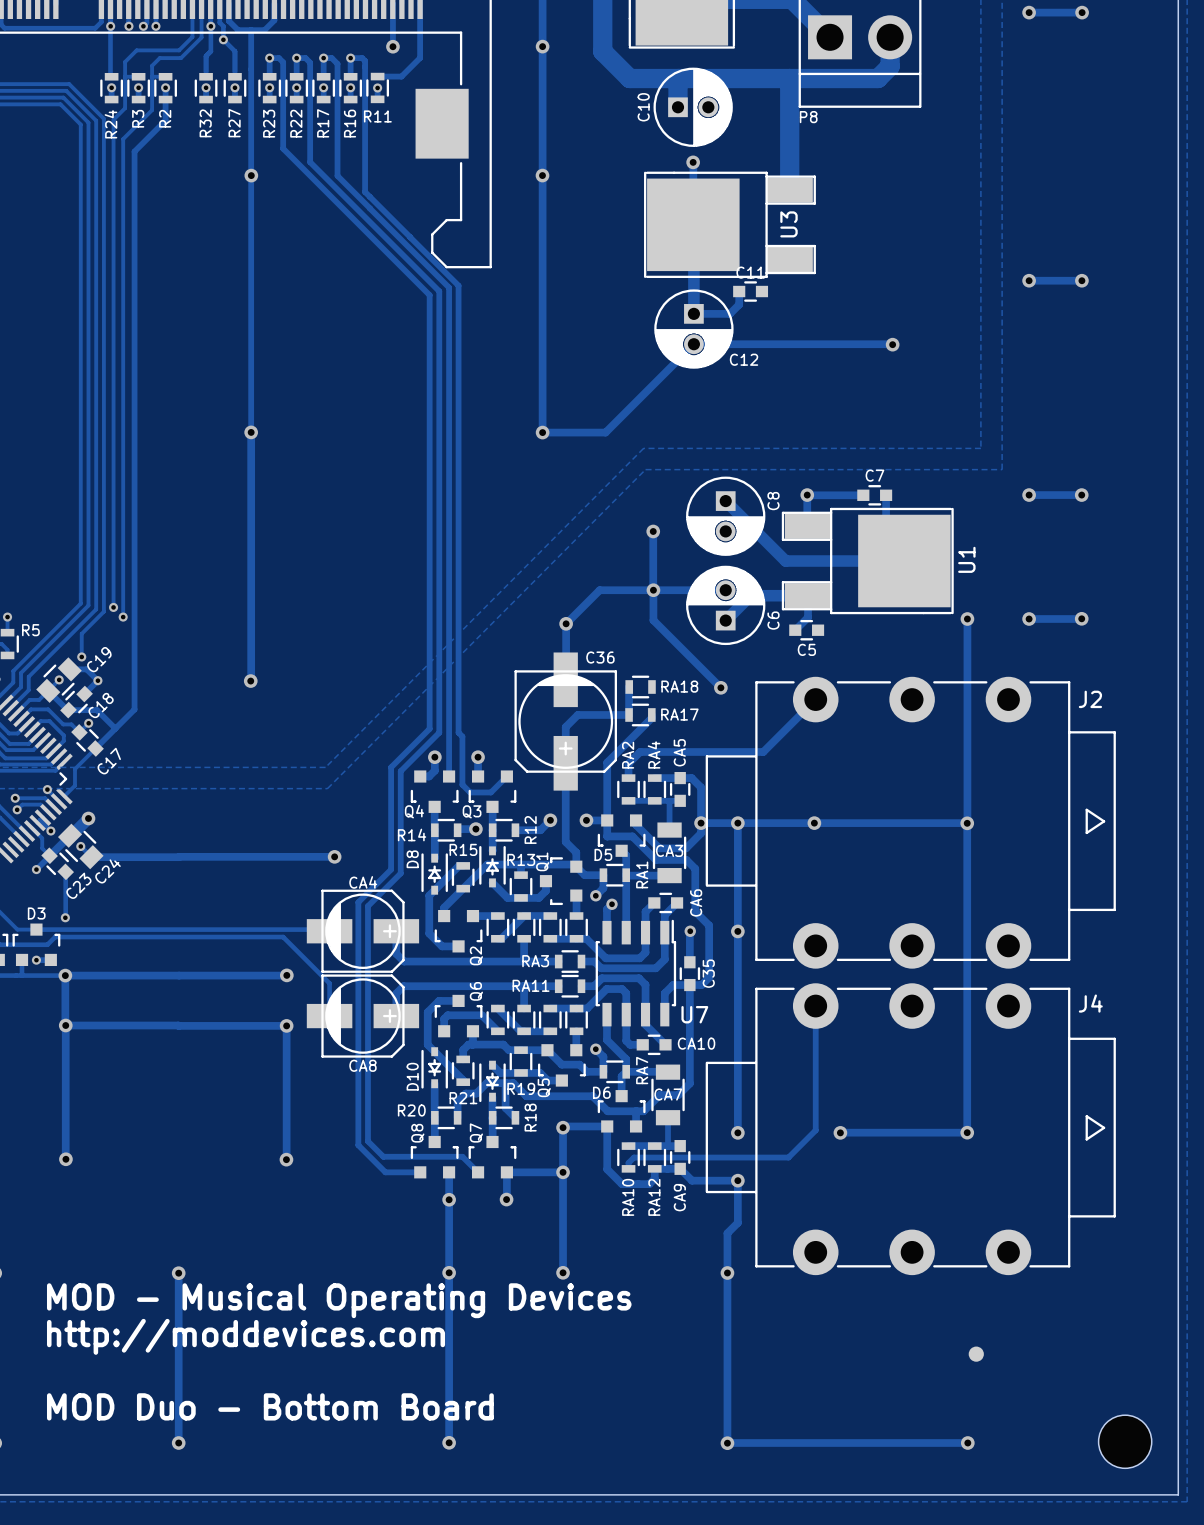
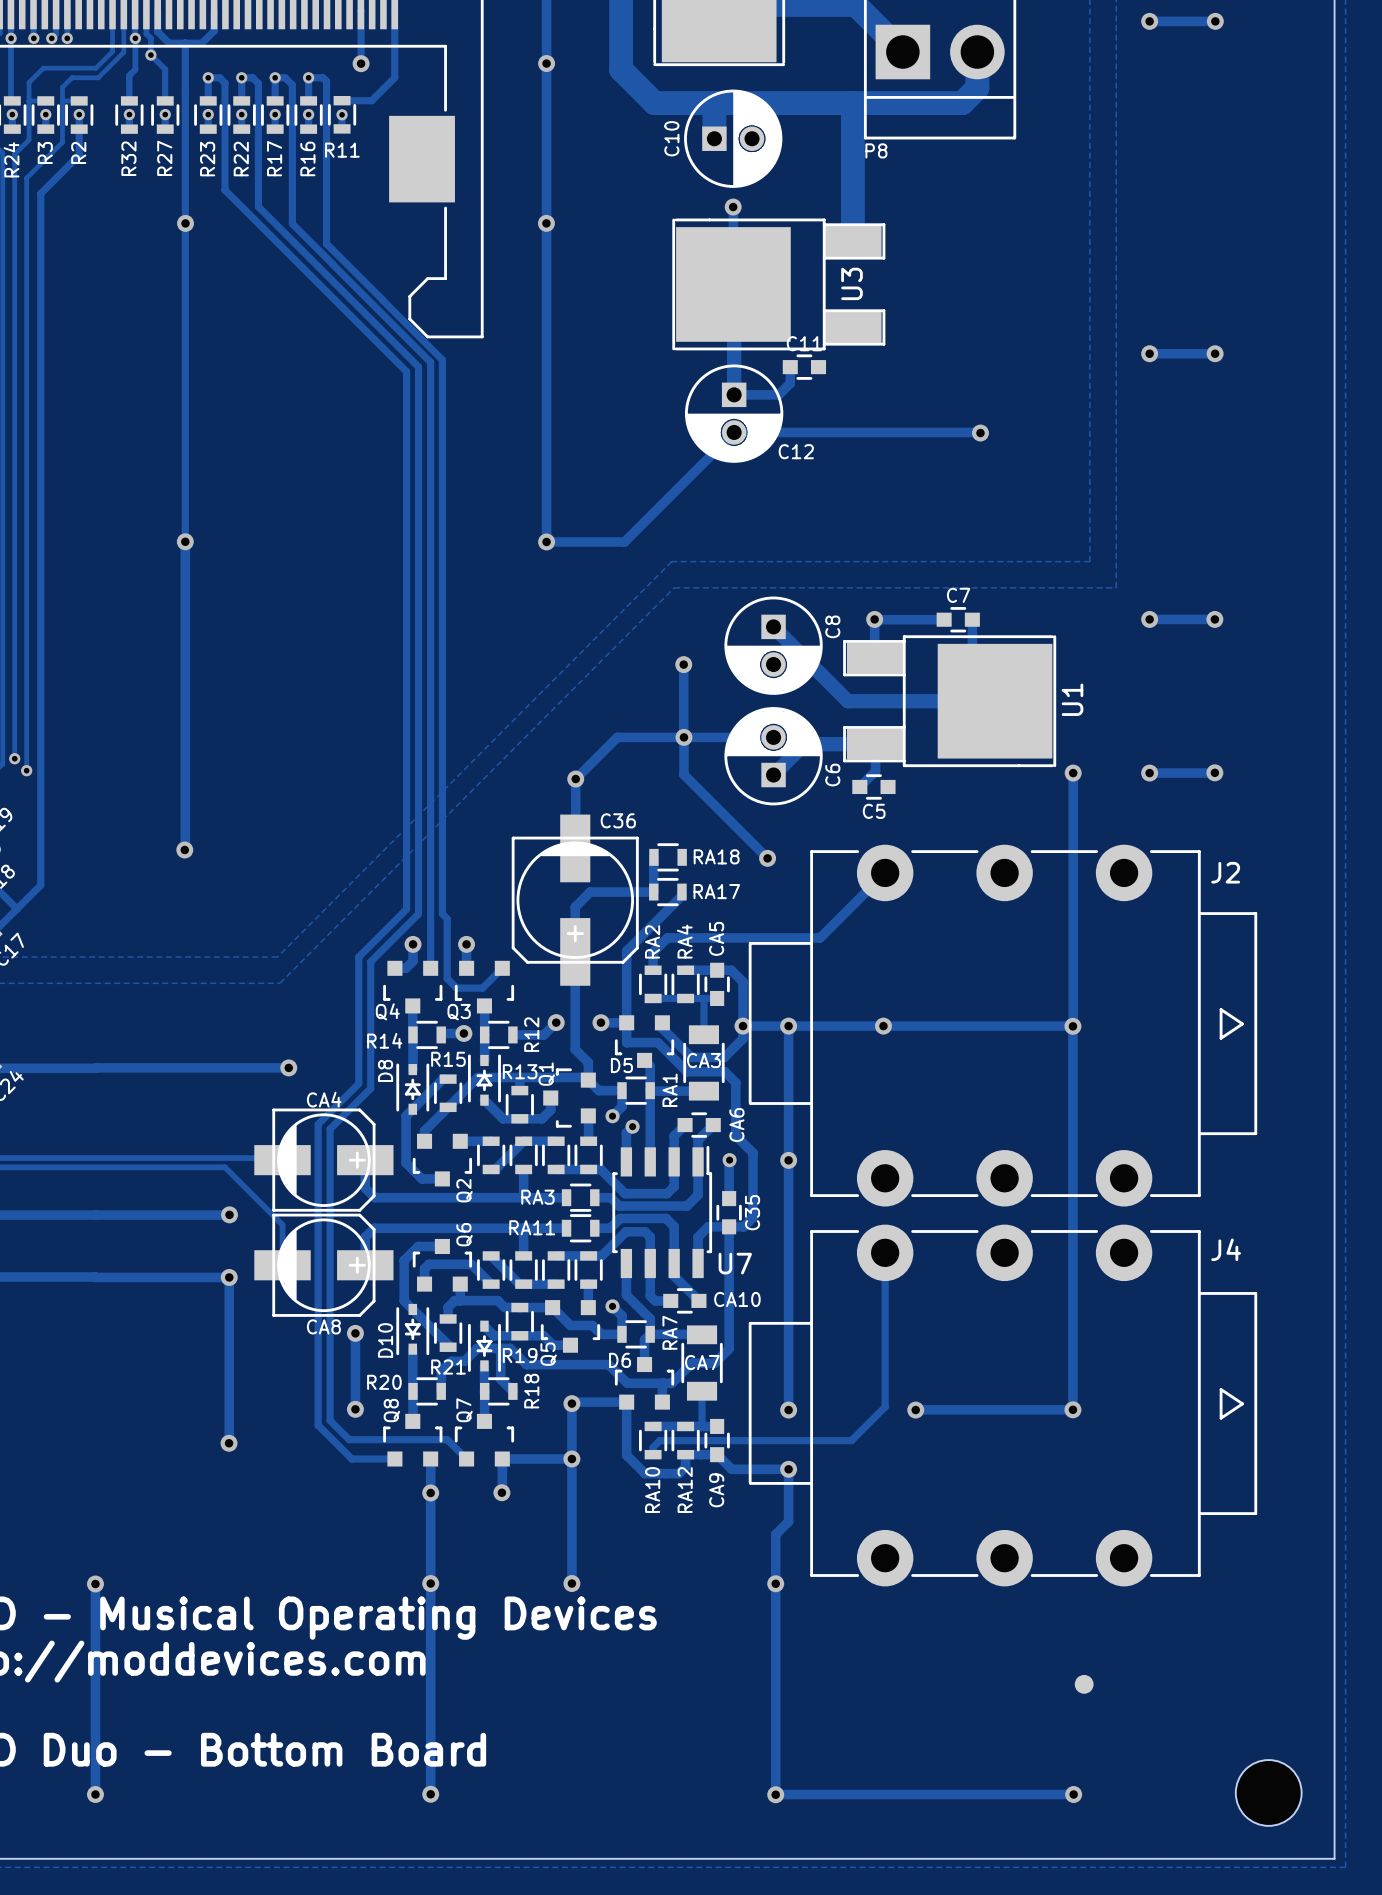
track: none -> (355, 1333) (355, 1409)
via: none -> (355, 1333)
via: none -> (355, 1409)

